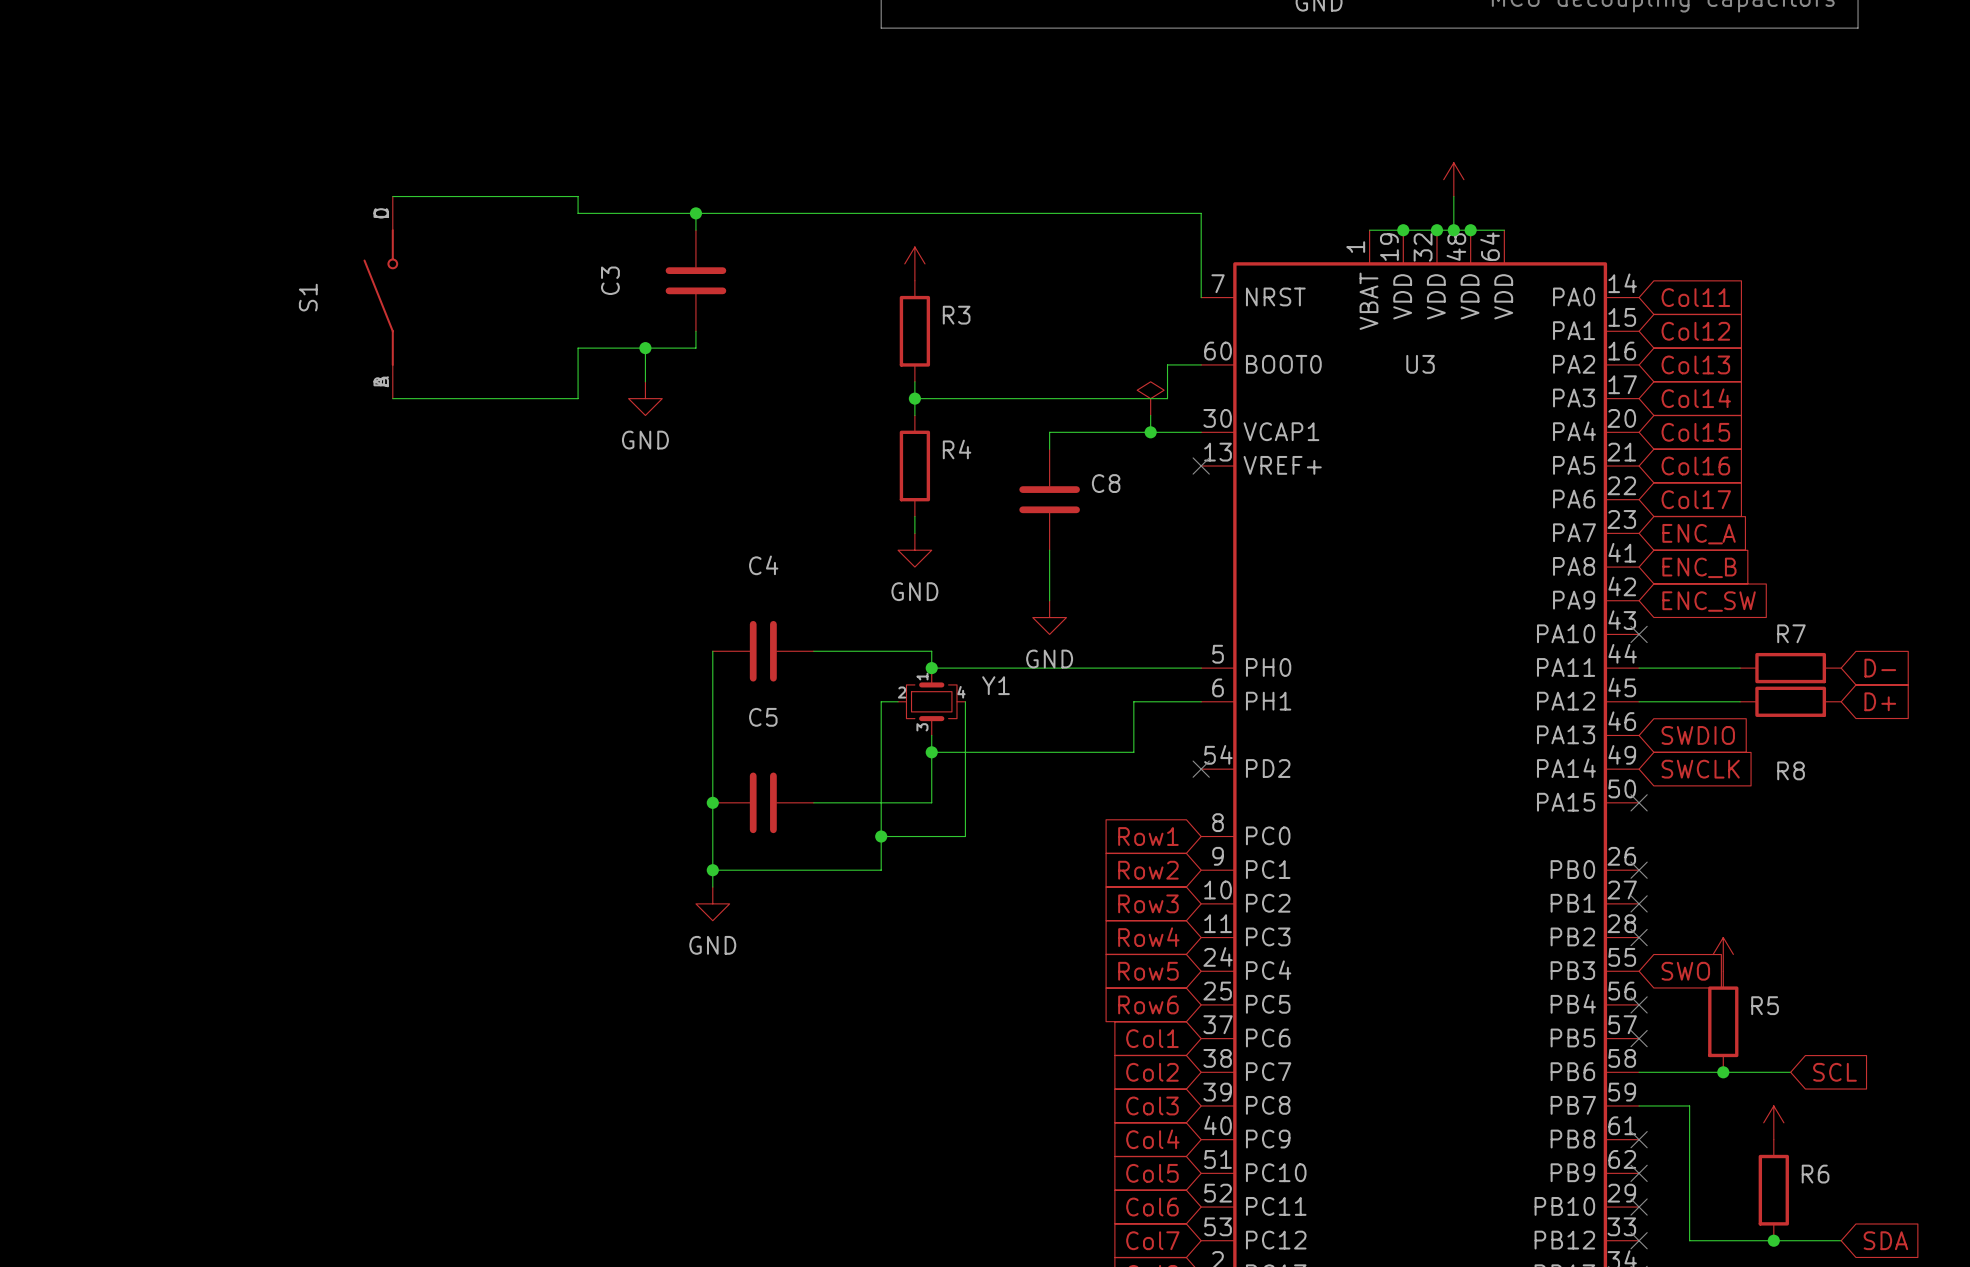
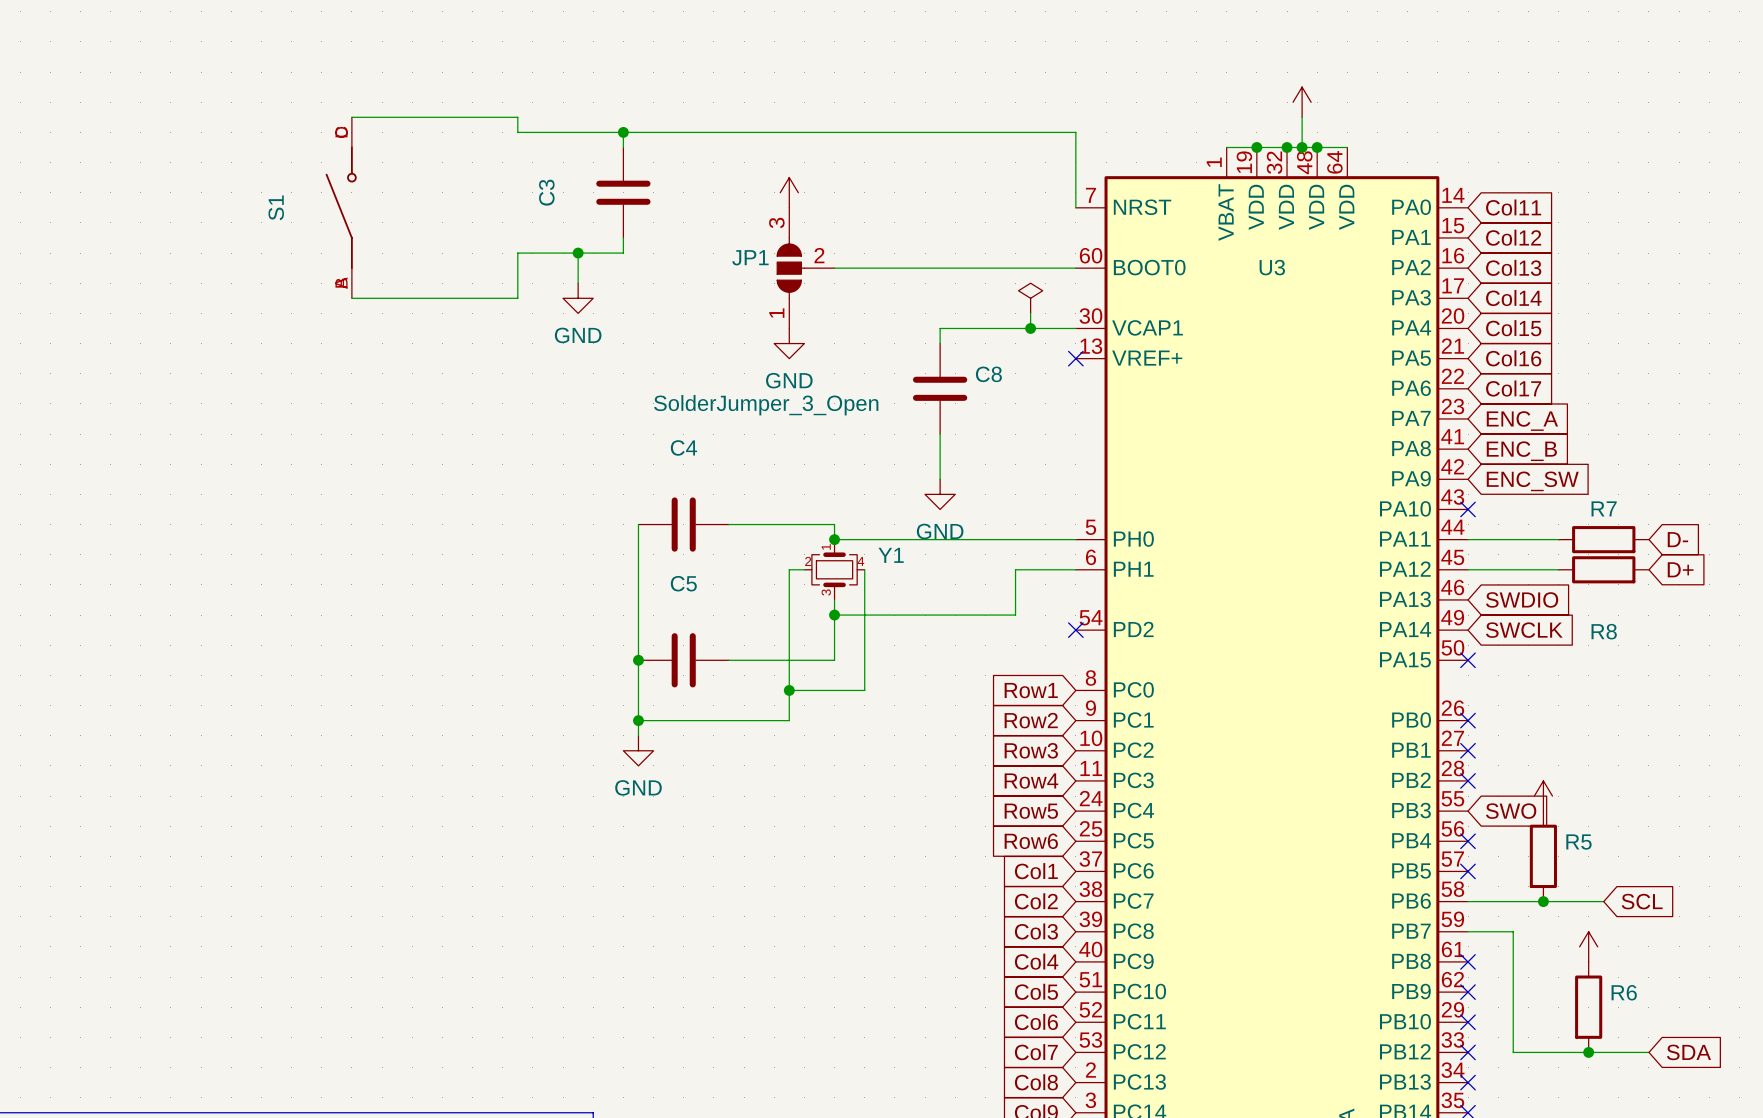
power symbol position: (914, 263) -> (789, 192)
R3: (914, 331) -> none
JP1: none -> SolderJumper_3_Open (805, 268)
wire: (1167, 364) (1167, 398) (914, 398) -> (1045, 268) (834, 268)
wire: (914, 381) (914, 415) -> none
junction: (914, 398) -> none
R4: (914, 466) -> none
wire: (914, 516) (914, 533) -> none
power symbol position: GND (914, 550) -> GND (789, 343)

